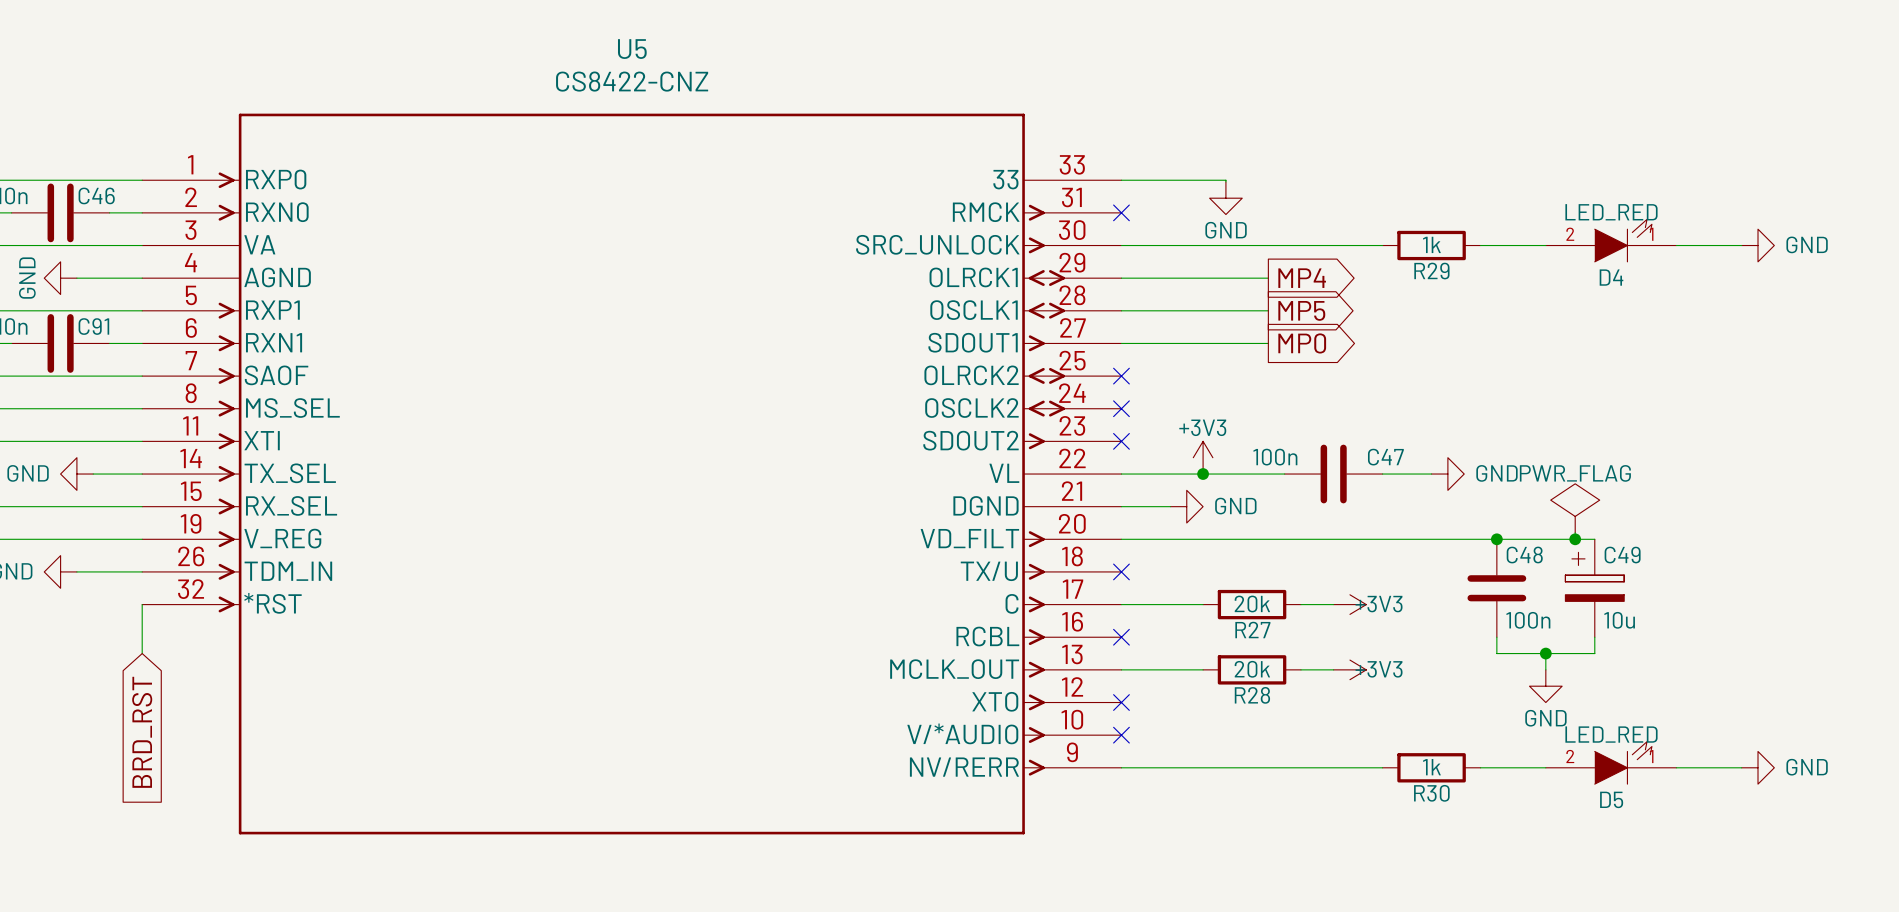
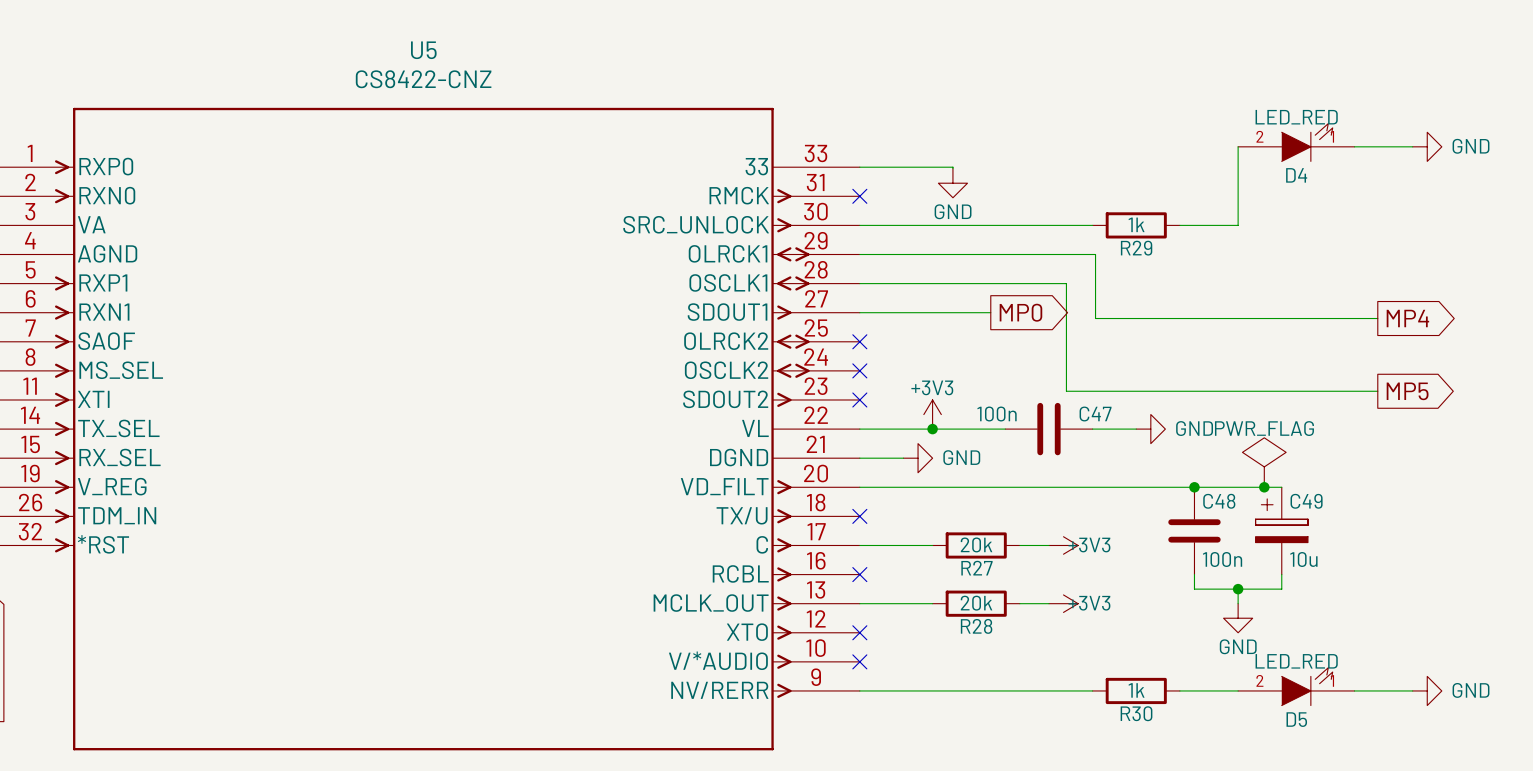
wire: none -> (1238, 146) (1238, 225)
D4 position: (1611, 240) -> (1296, 142)
wire: (1676, 245) (1741, 245) -> (1354, 146) (1412, 146)
power symbol position: GND (1758, 245) -> GND (1427, 146)
wire: none -> (990, 254) (1095, 254) (1095, 318) (1377, 318)
global label: MP4 (1302, 278) -> none
wire: none -> (990, 283) (1066, 283) (1066, 391) (1377, 391)
global label: MP5 (1301, 310) -> none
global label: none -> MP4 (1407, 318)
global label: none -> MP5 (1407, 391)

